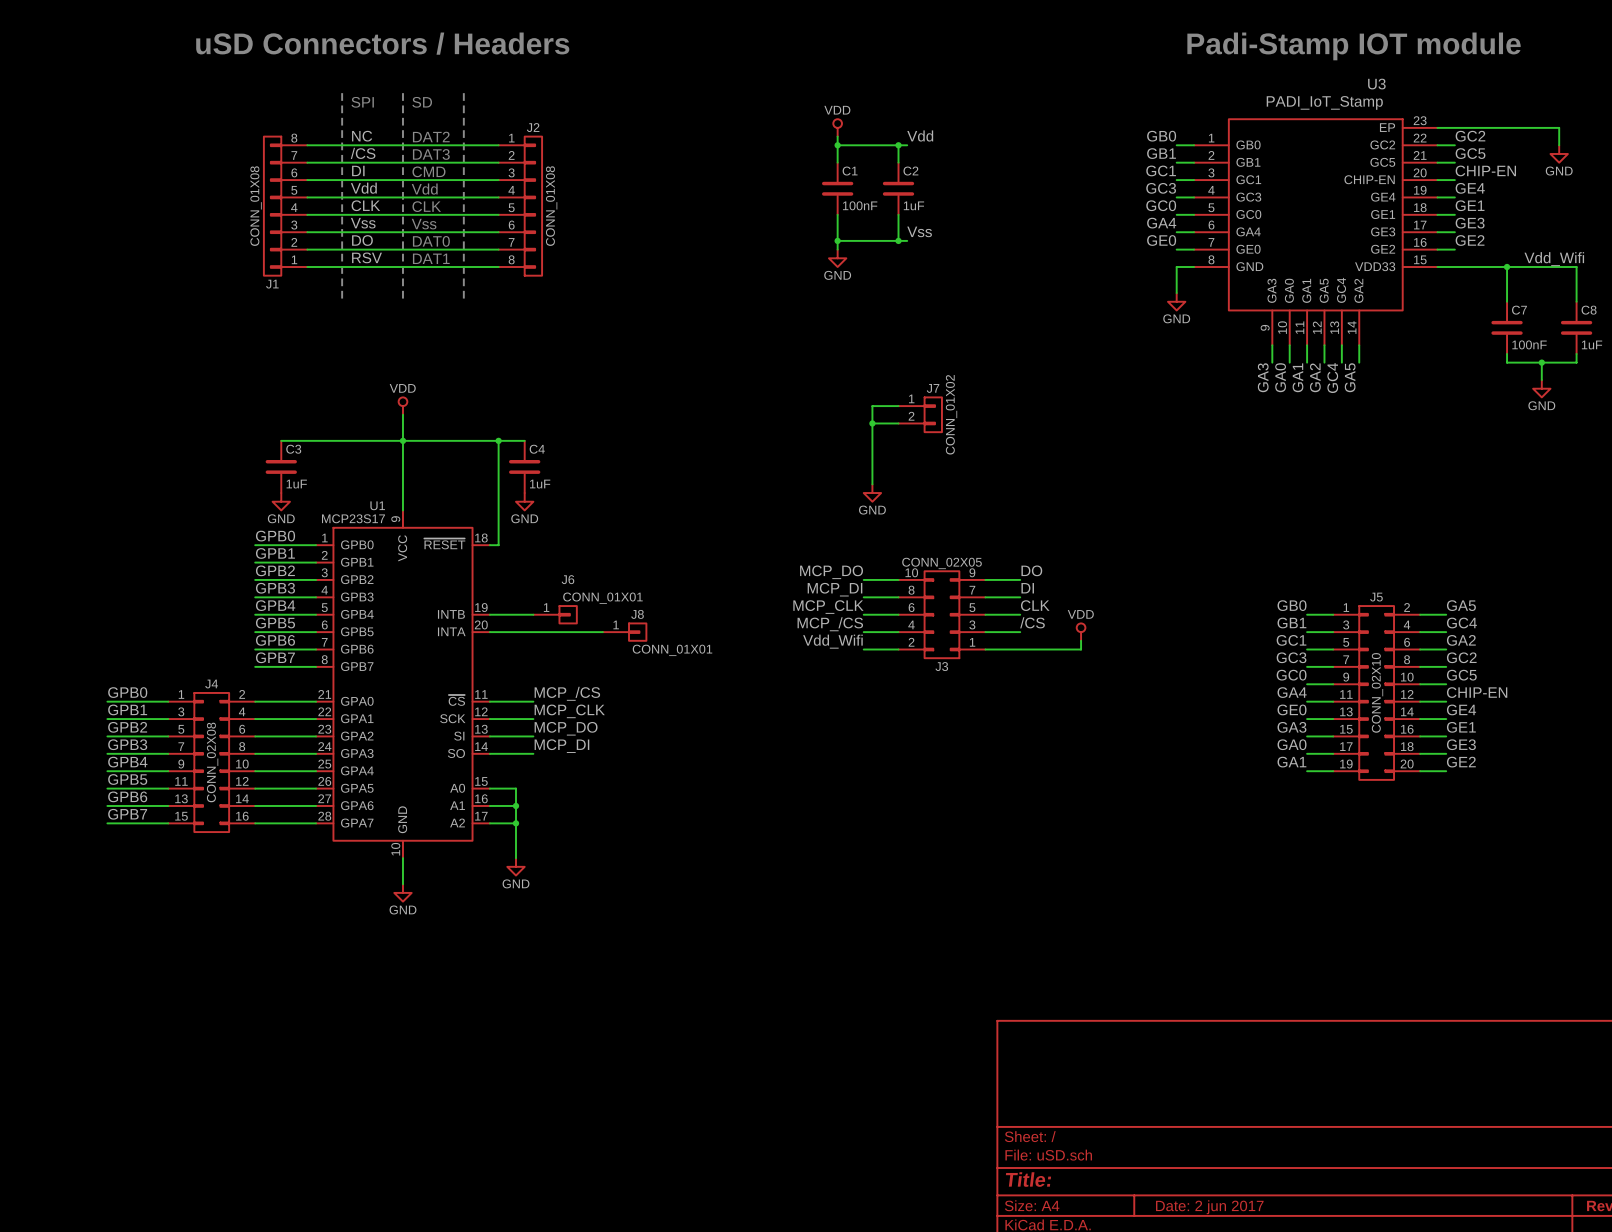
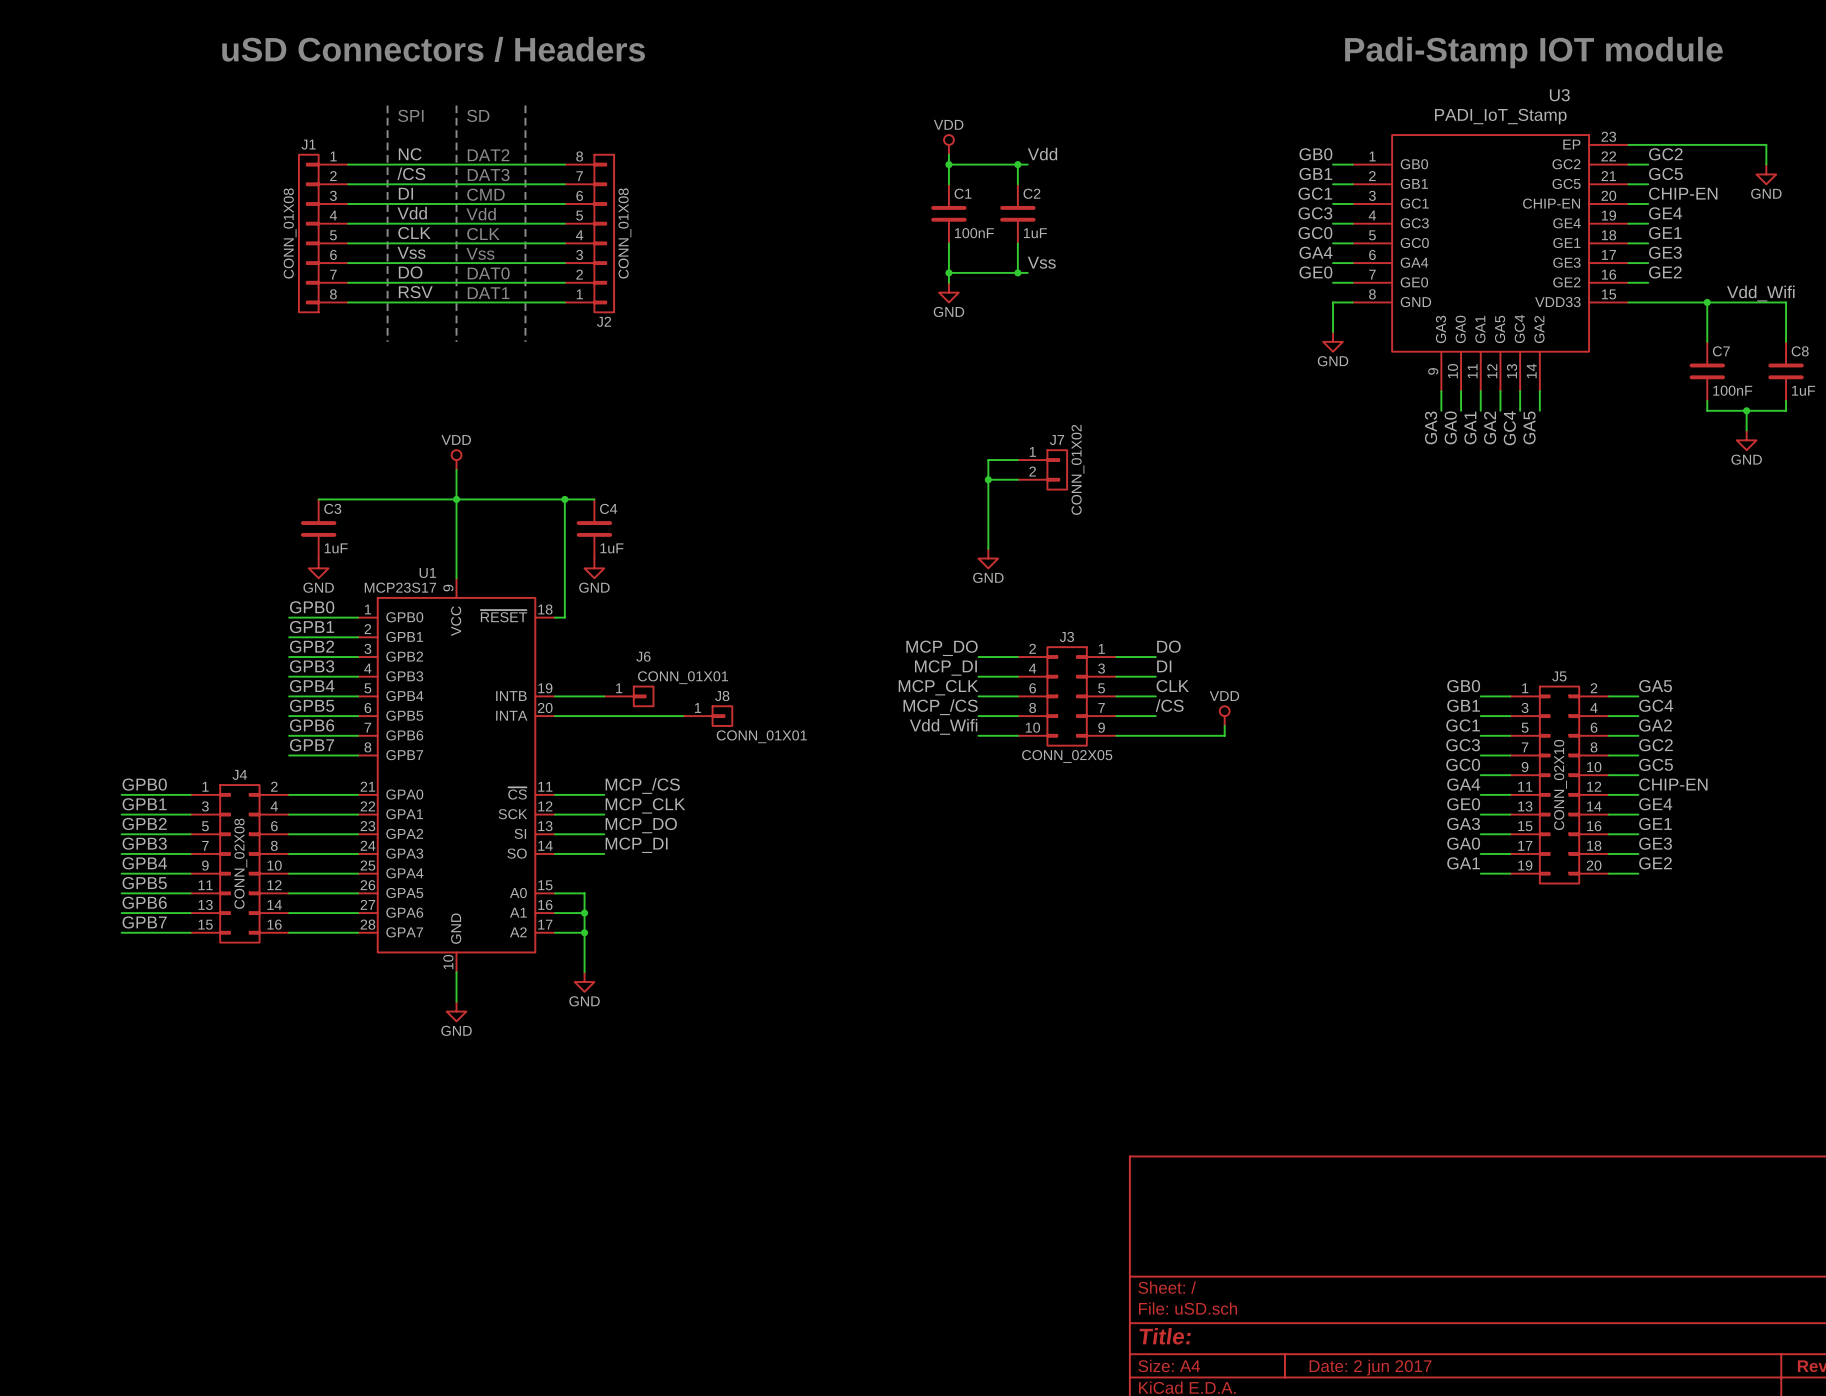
J1 flip: as is (272, 206) -> up-down (308, 233)
J2 flip: as is (533, 206) -> up-down (604, 233)
J3 flip: as is (941, 614) -> up-down (1067, 696)

